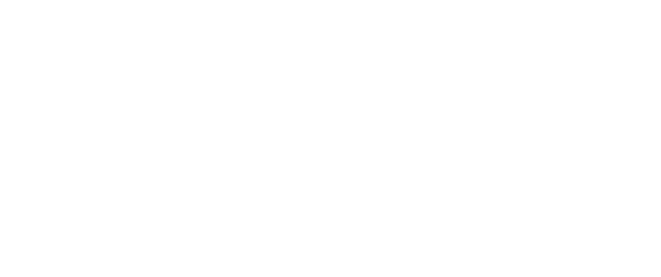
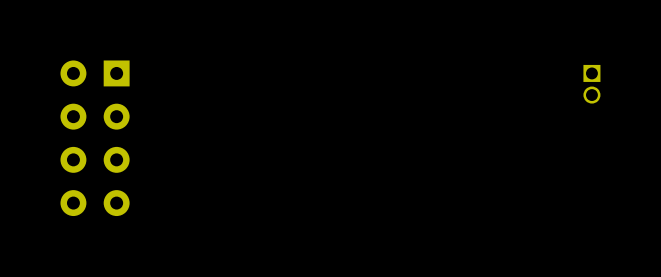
part: none -> (591, 84)
part: none -> (95, 138)

